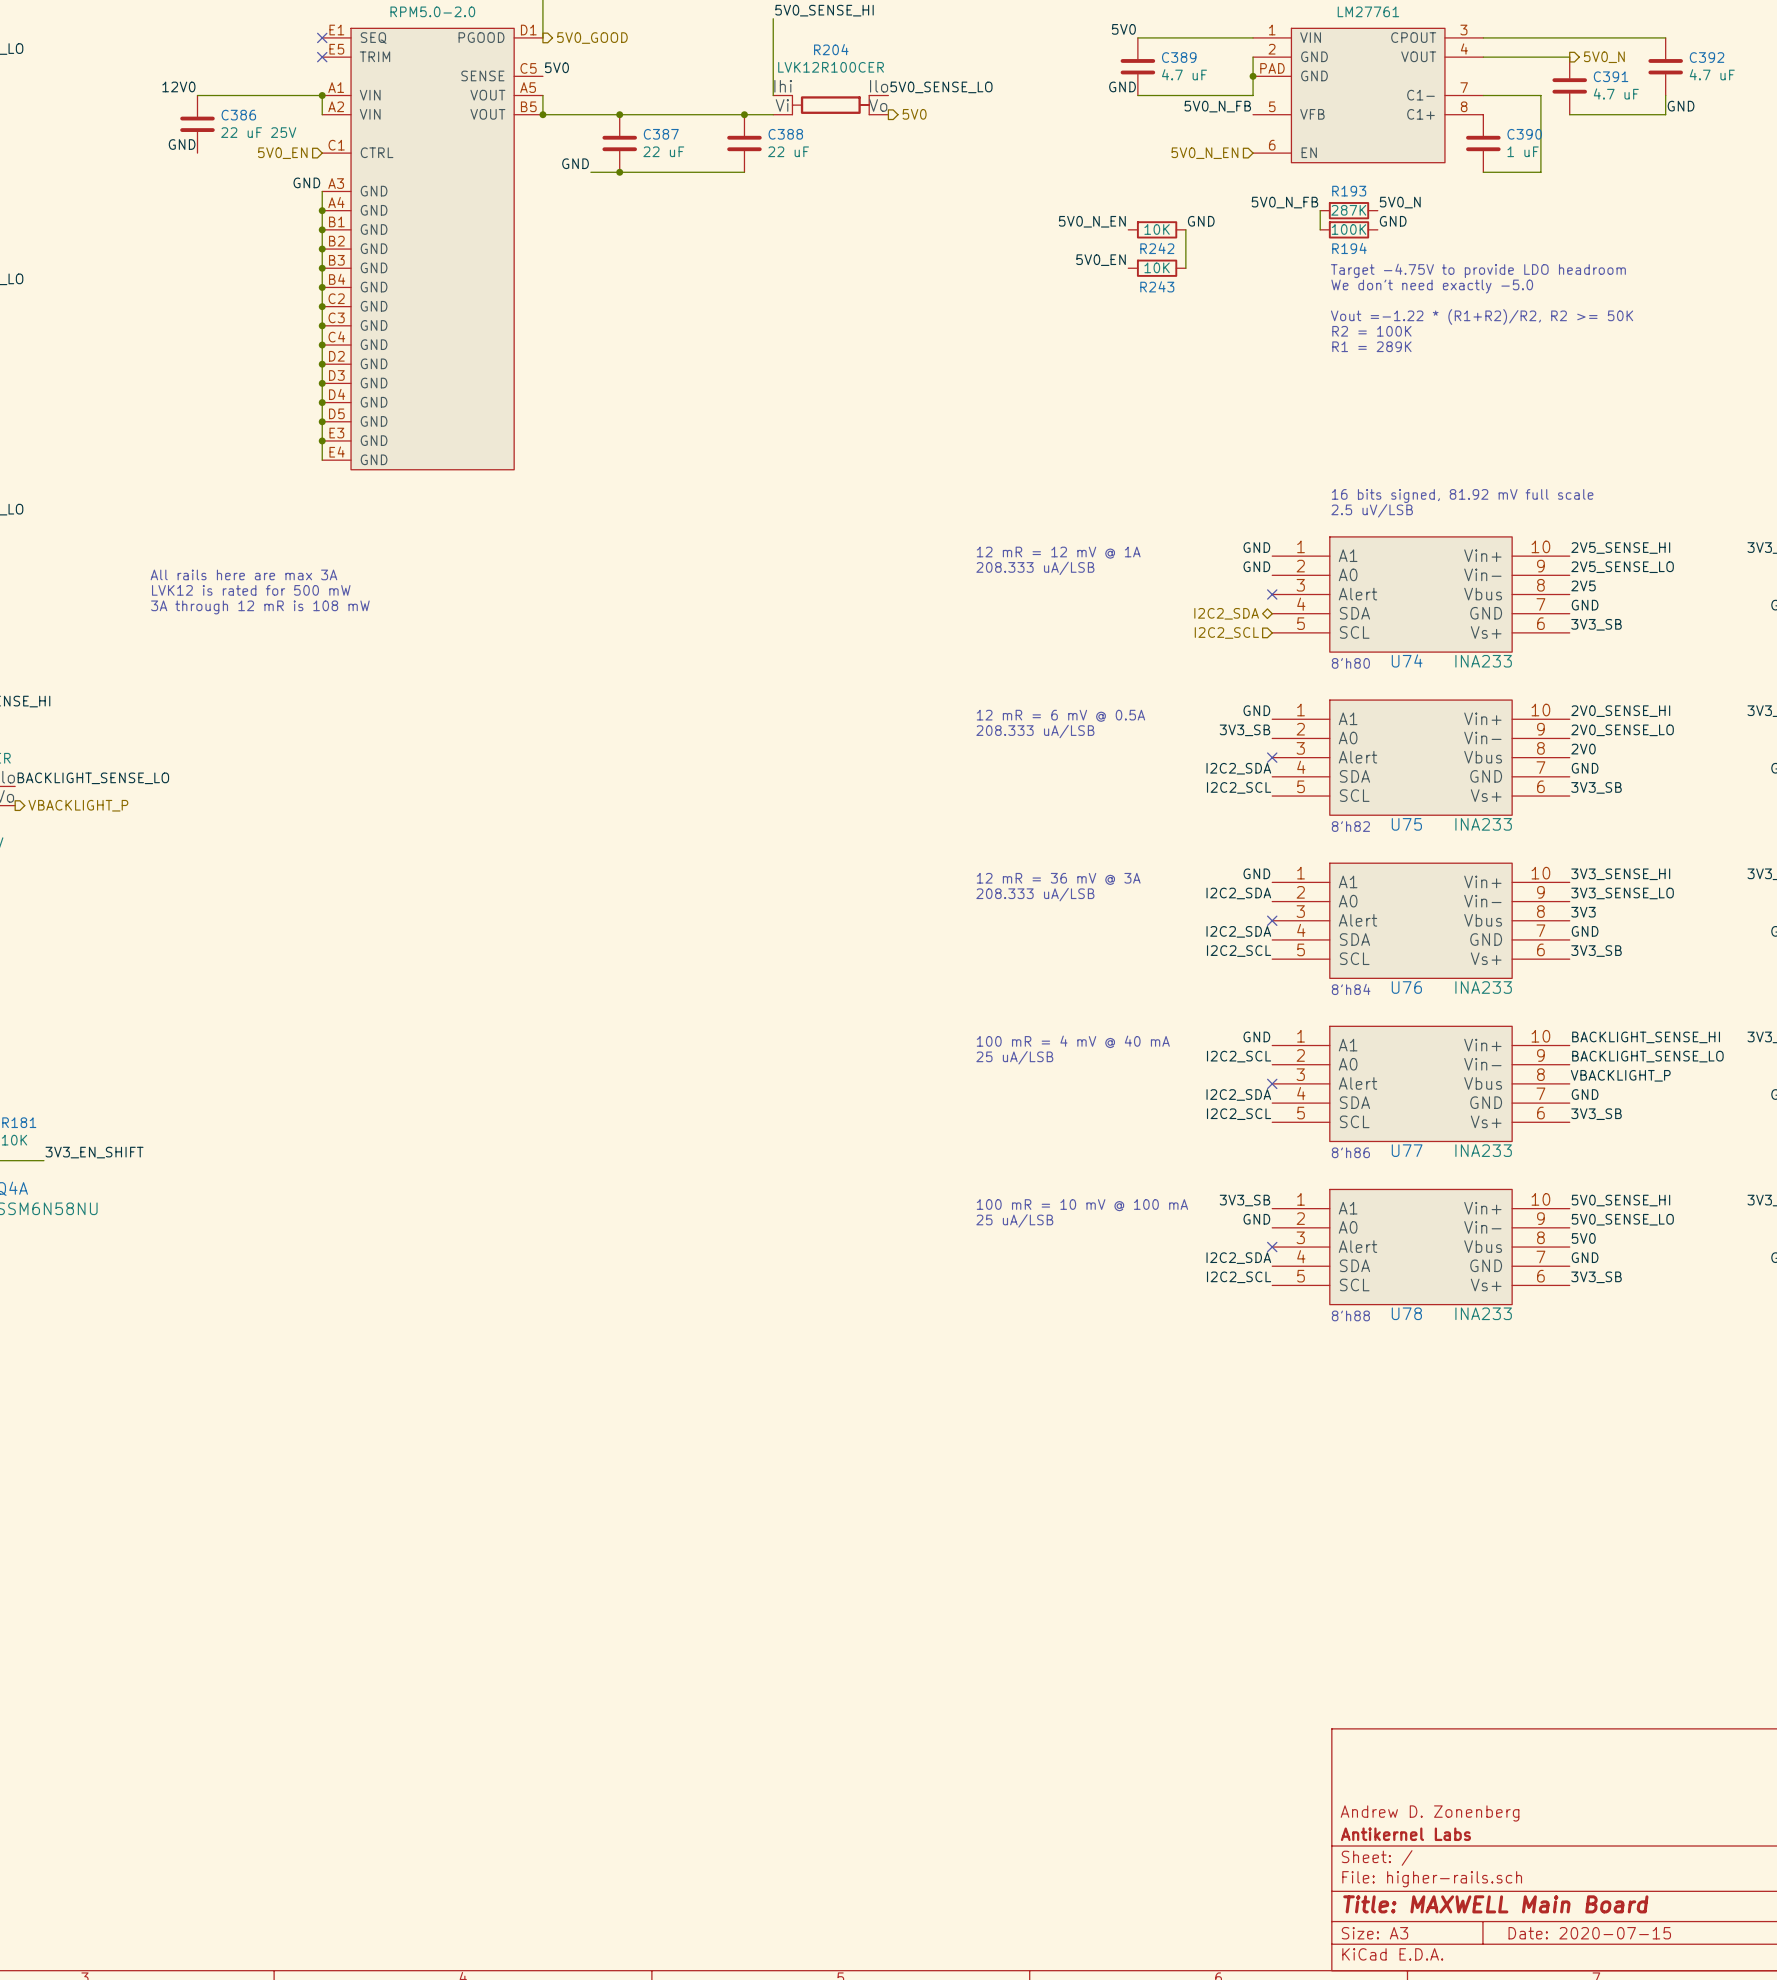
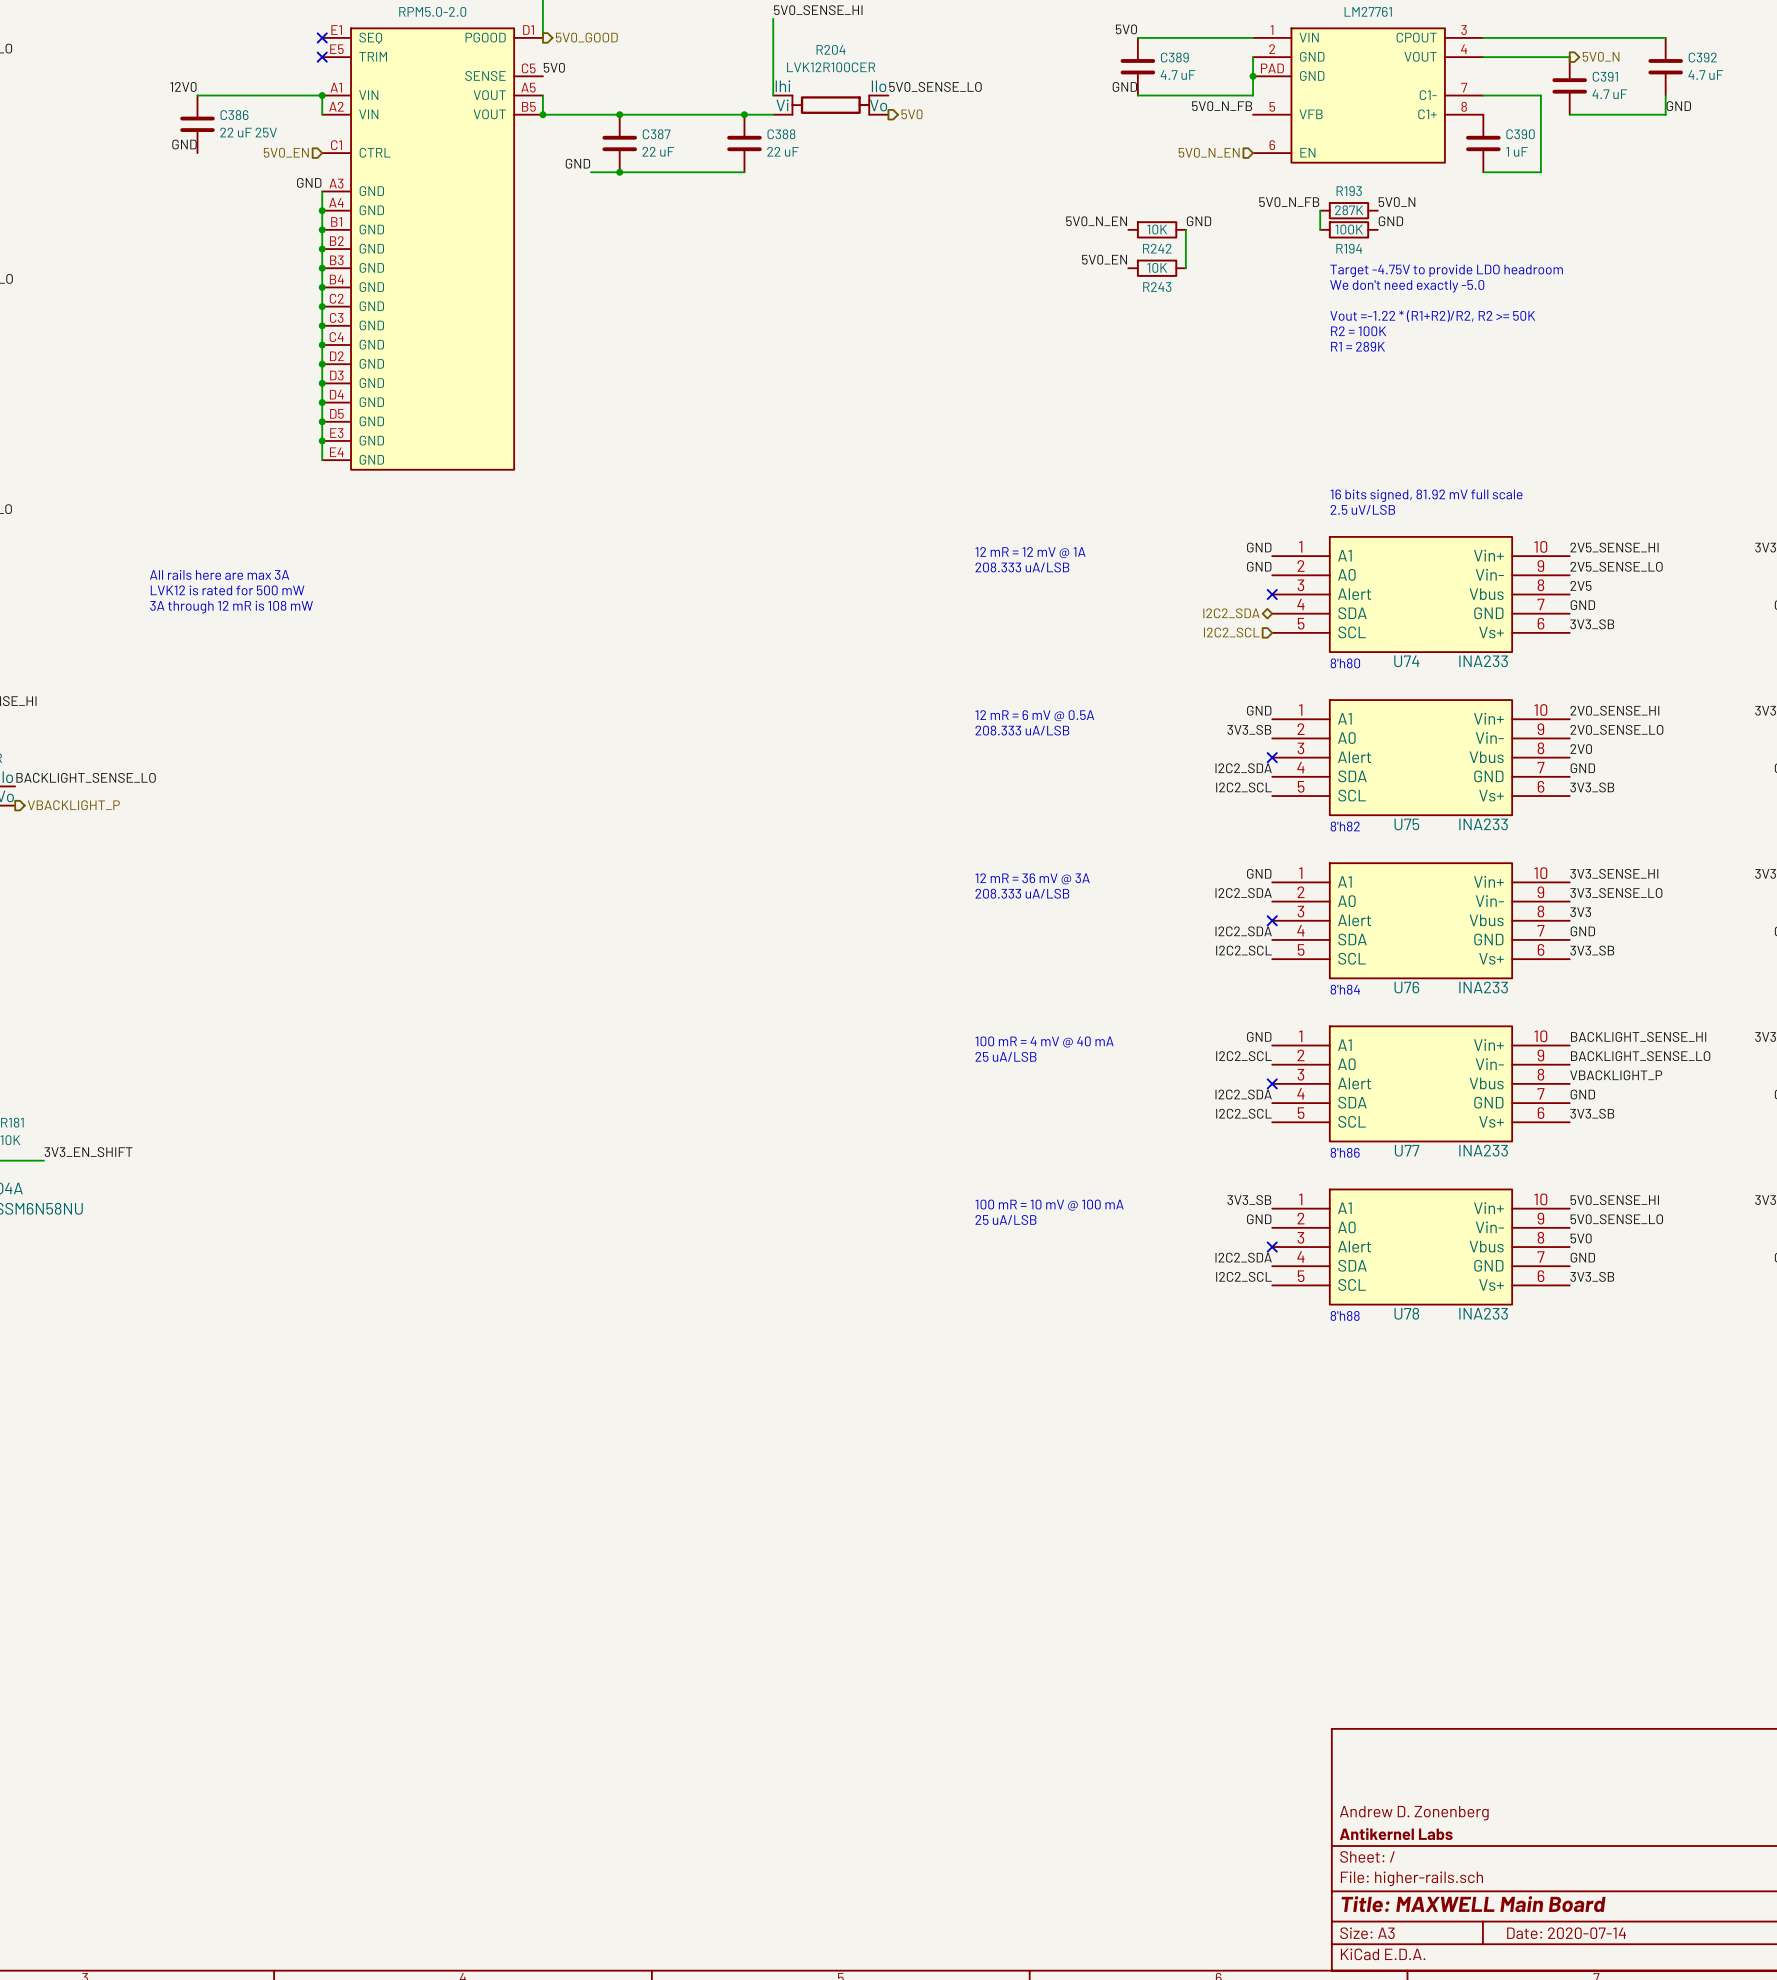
title block: Date: 2020-07-15 (1589, 1933) -> Date: 2020-07-14 (1566, 1933)

